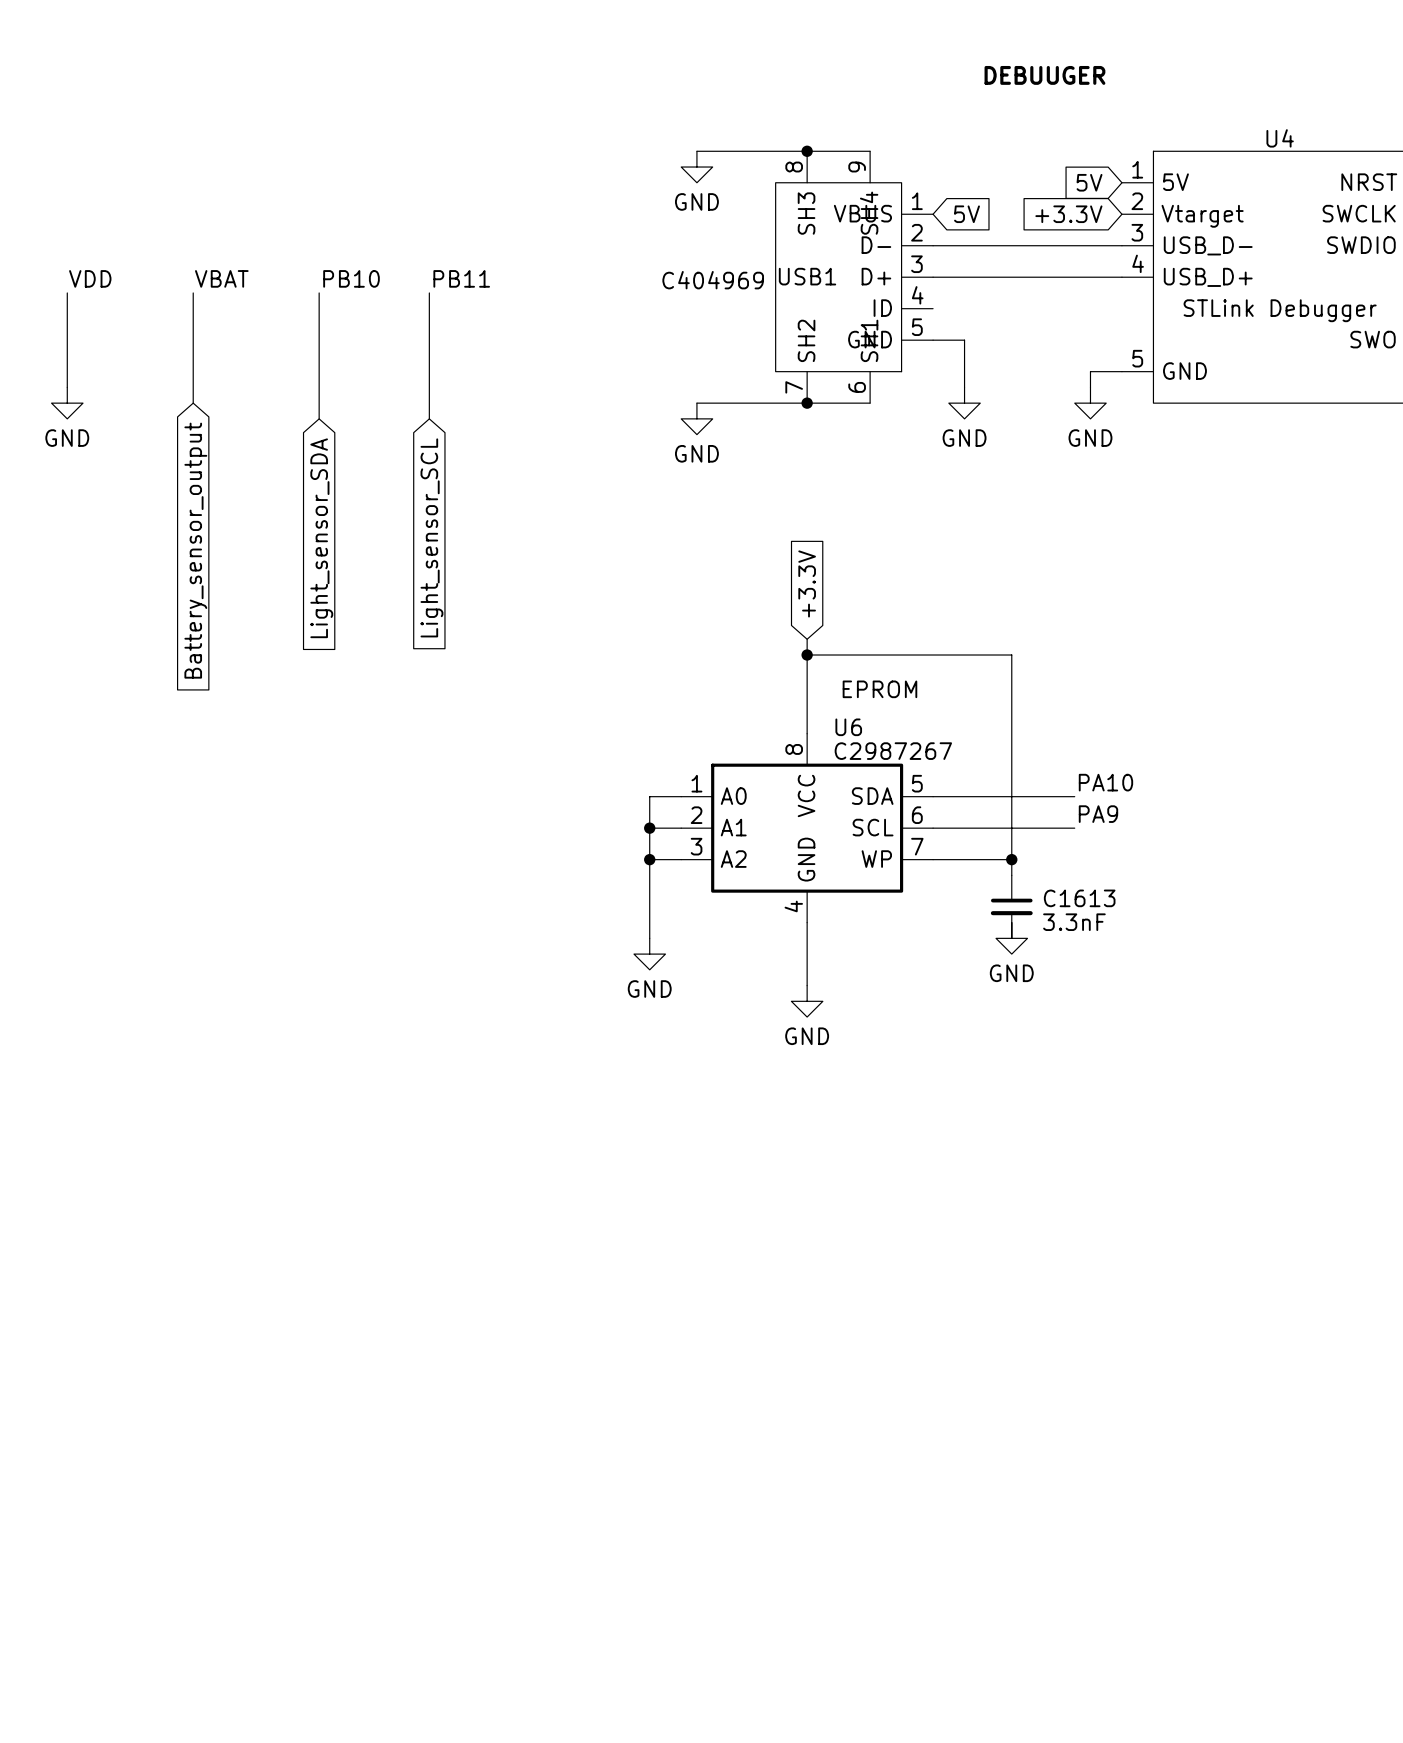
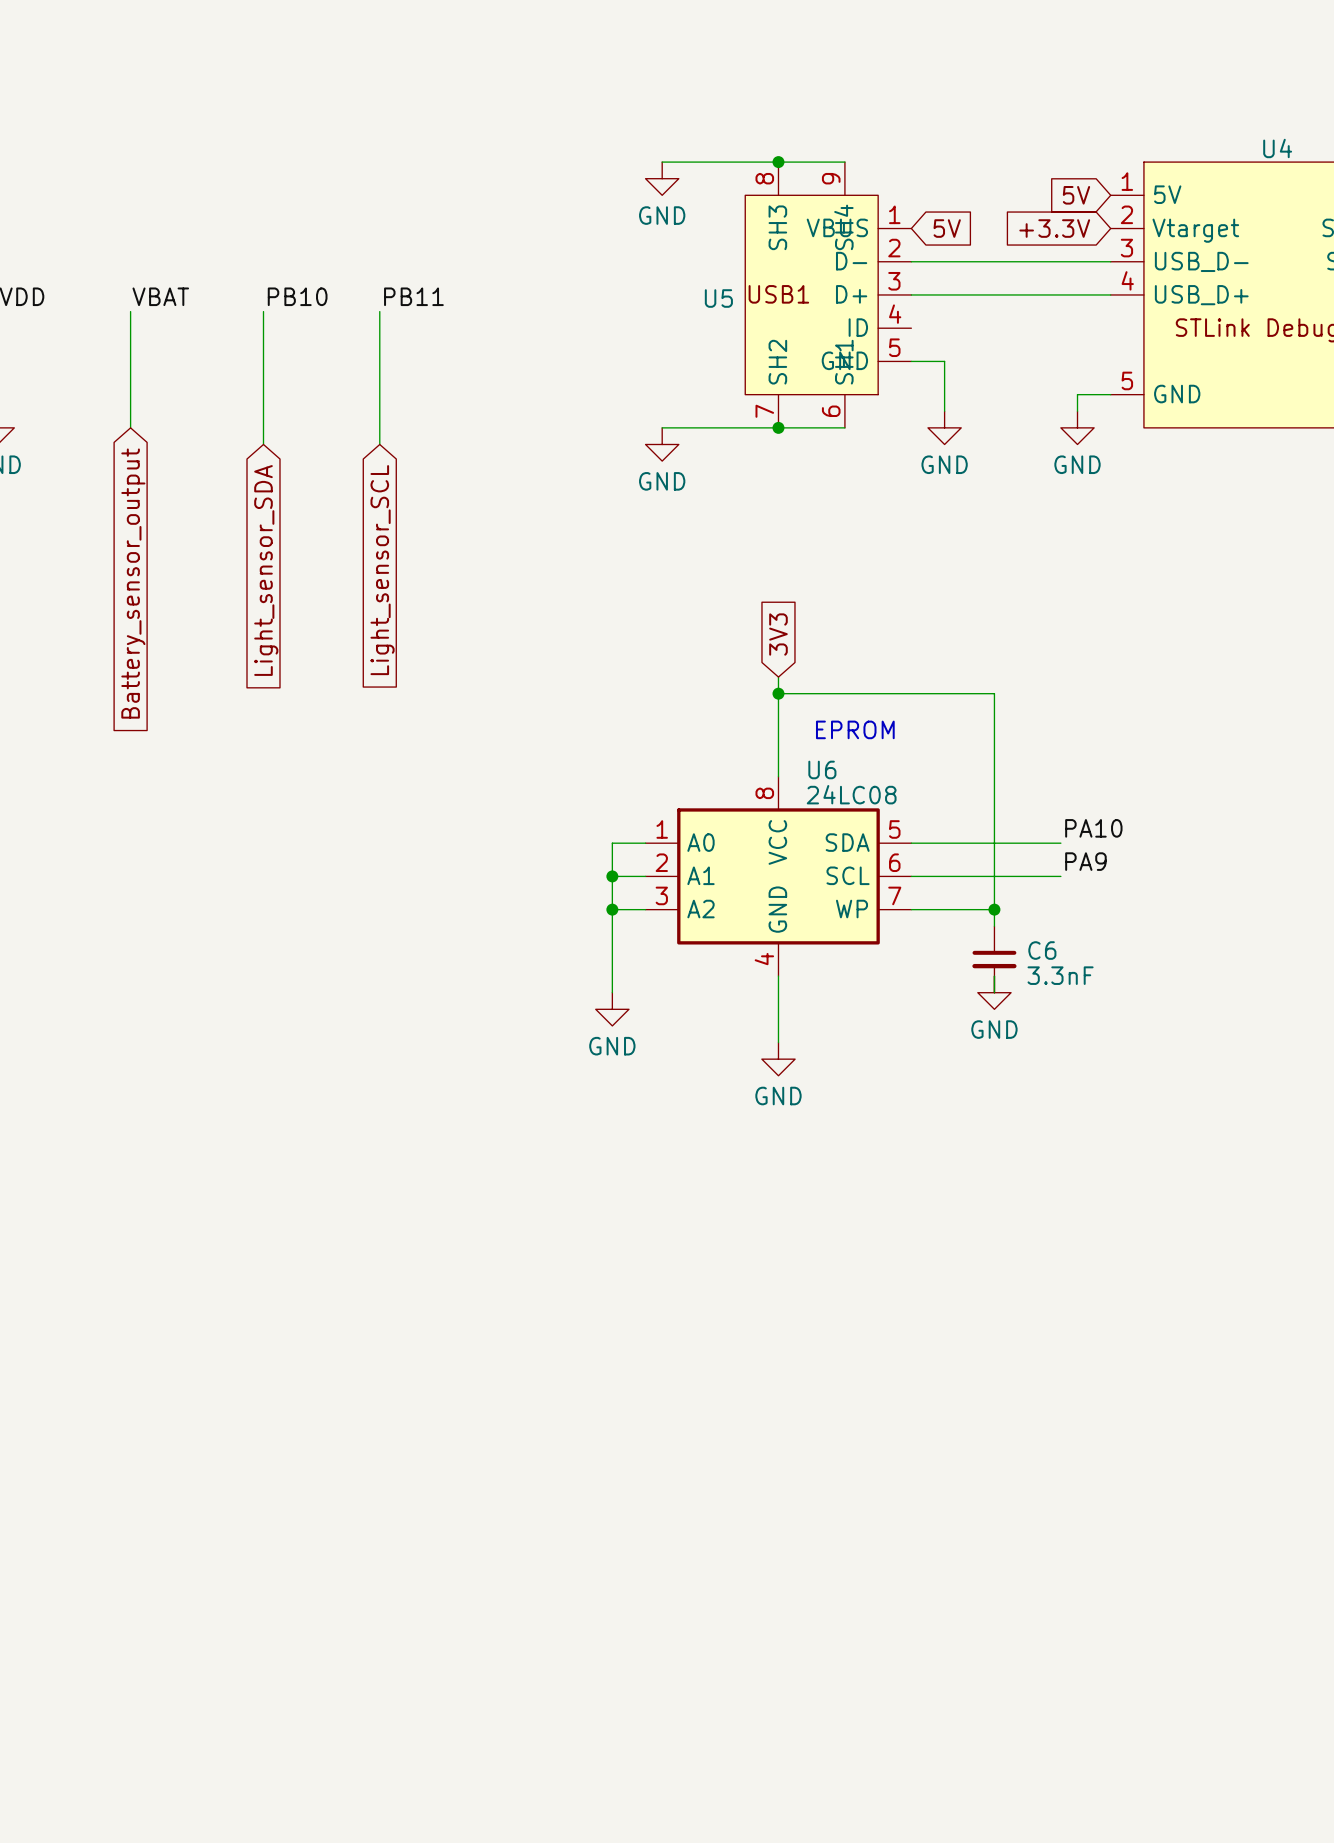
text: DEBUUGER (1044, 75) -> none
C404969 name: C404969 (713, 280) -> U5 (718, 298)
global label: +3.3V (807, 583) -> 3V3 (778, 634)
U6 value: C2987267 (893, 751) -> 24LC08 (851, 794)
C1613 name: C1613 (1079, 898) -> C6 (1042, 950)

